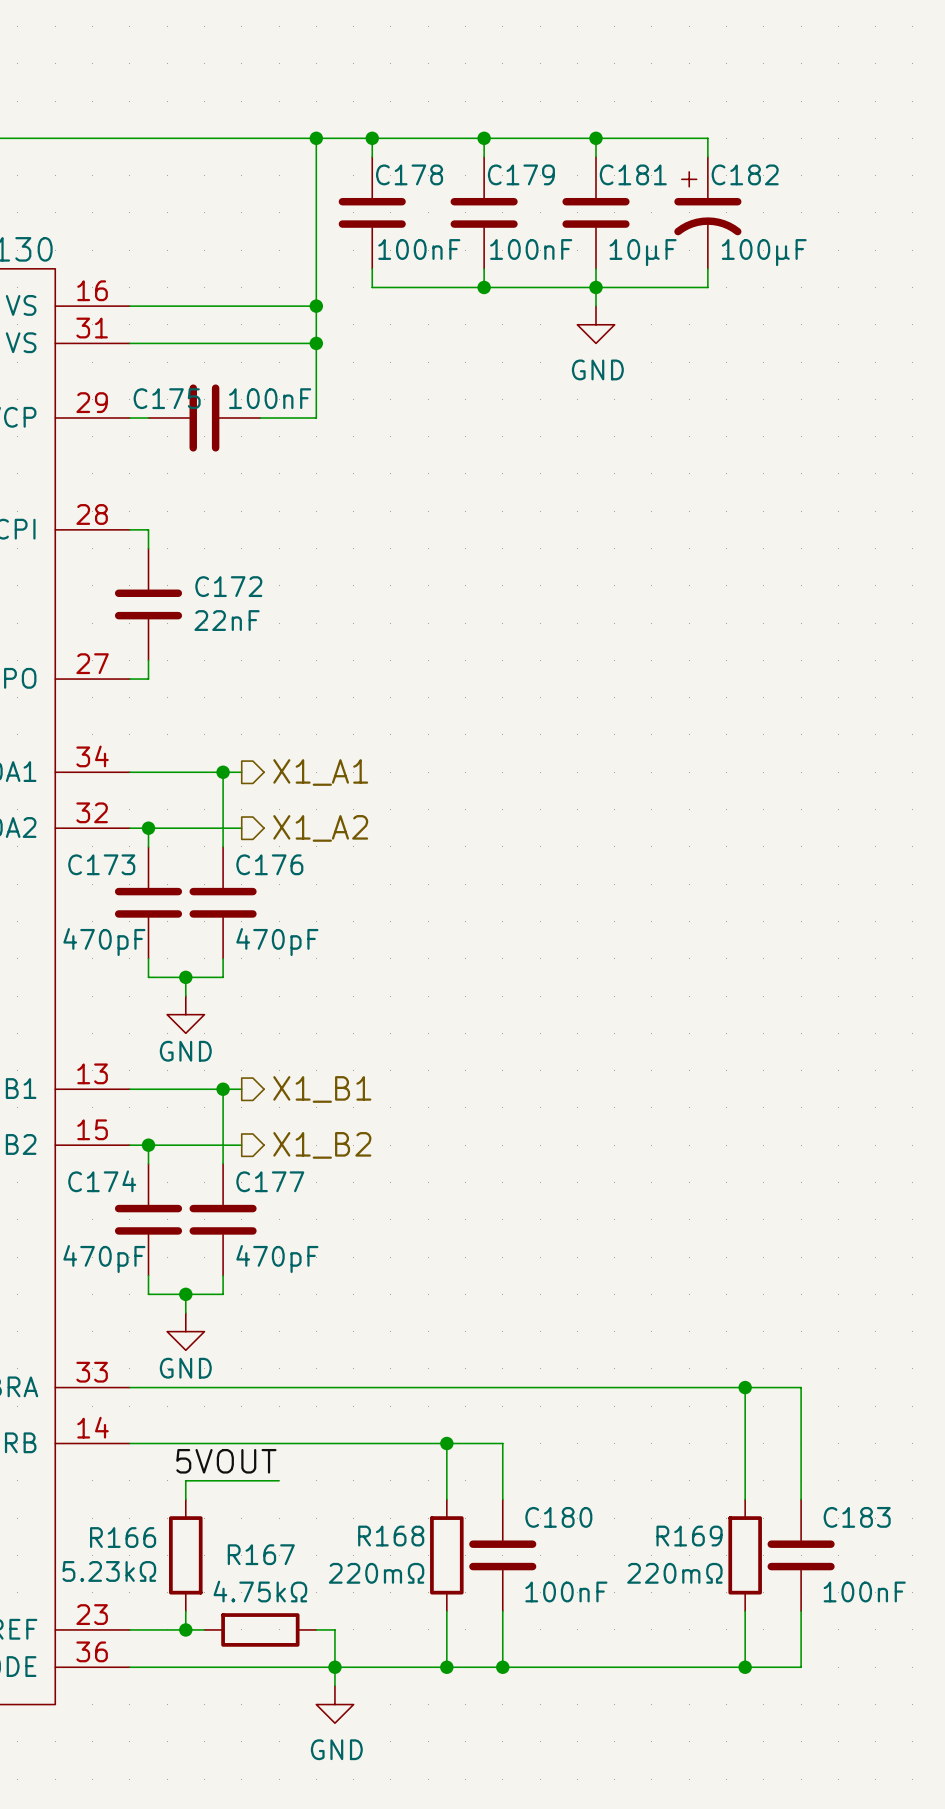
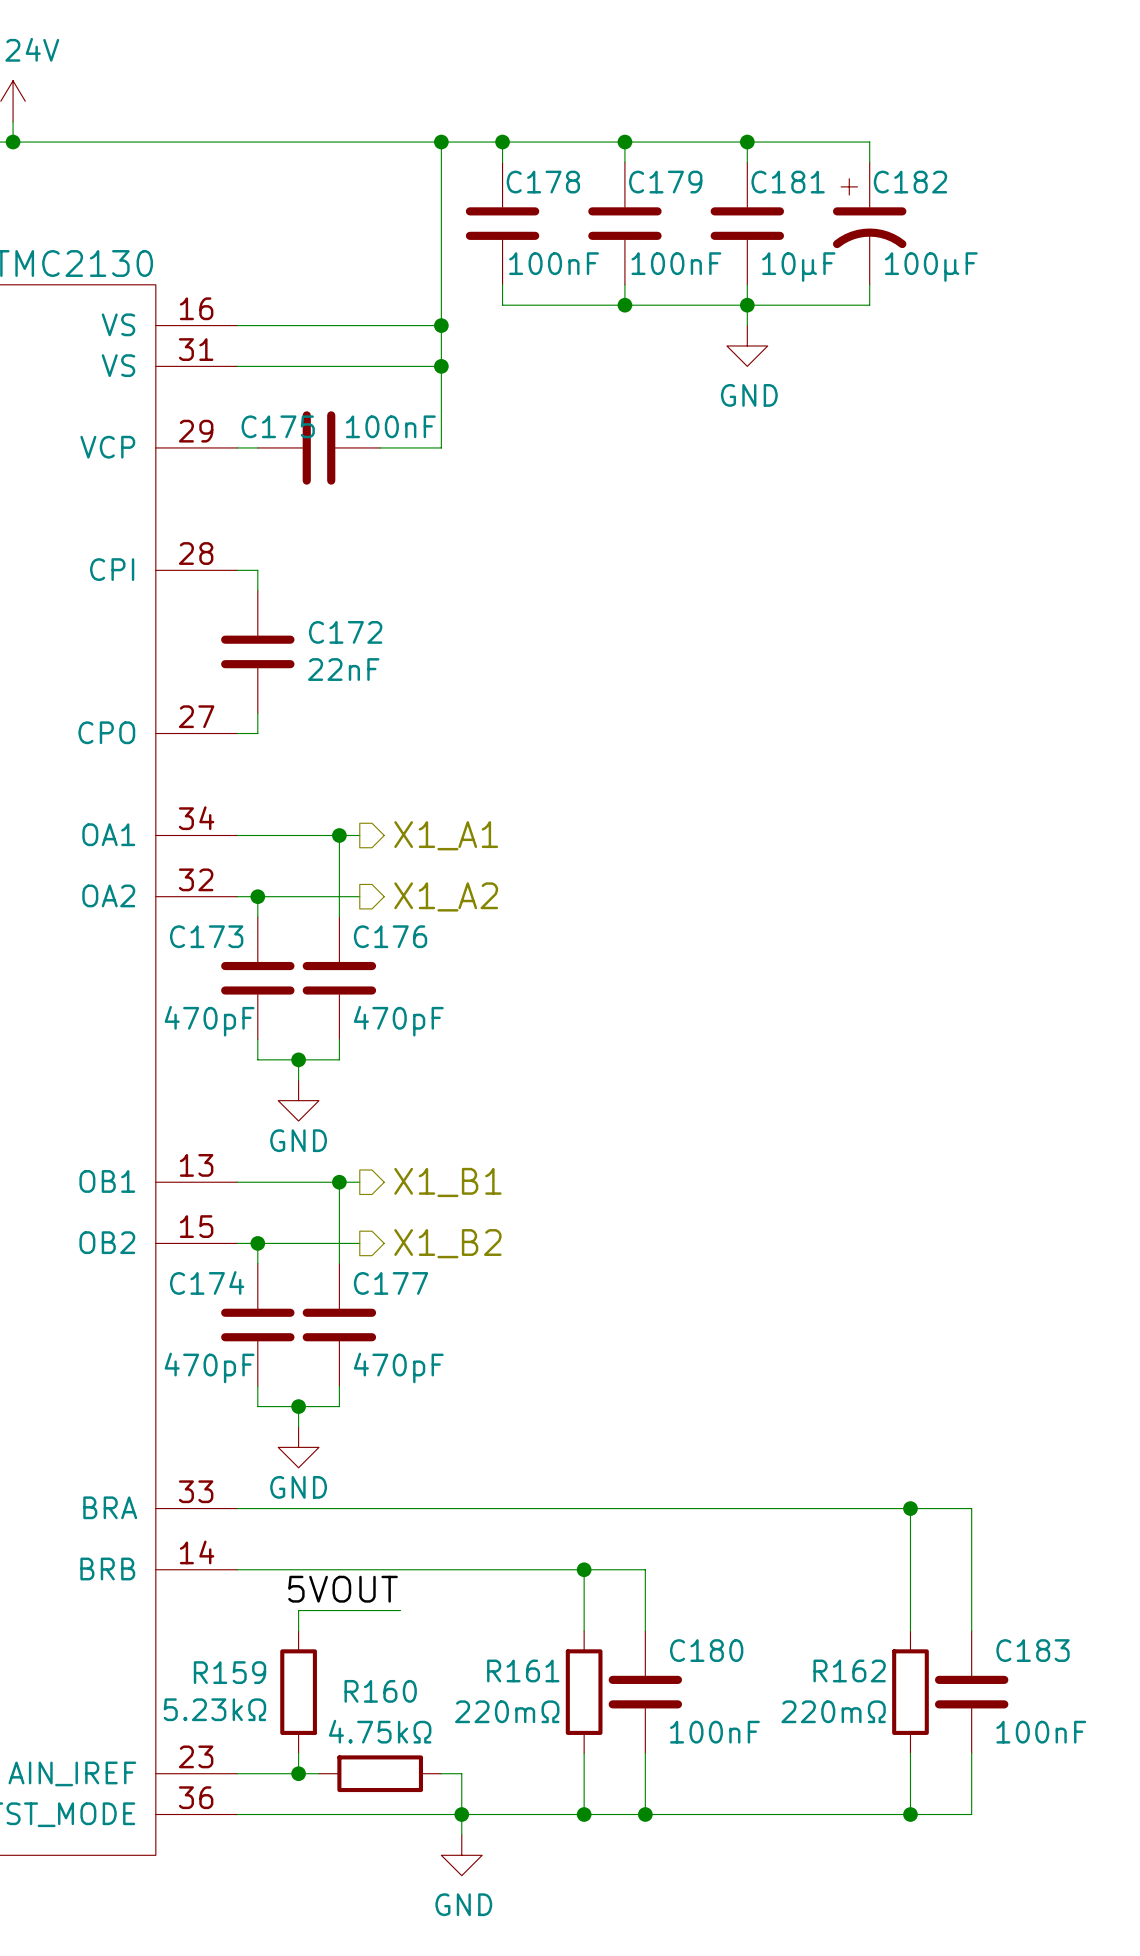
R168 name: R168 (391, 1536) -> R161 (523, 1670)
R169 name: R169 (689, 1536) -> R162 (849, 1670)
R166 name: R166 (123, 1537) -> R159 (229, 1672)
R167 name: R167 (261, 1554) -> R160 (380, 1691)

